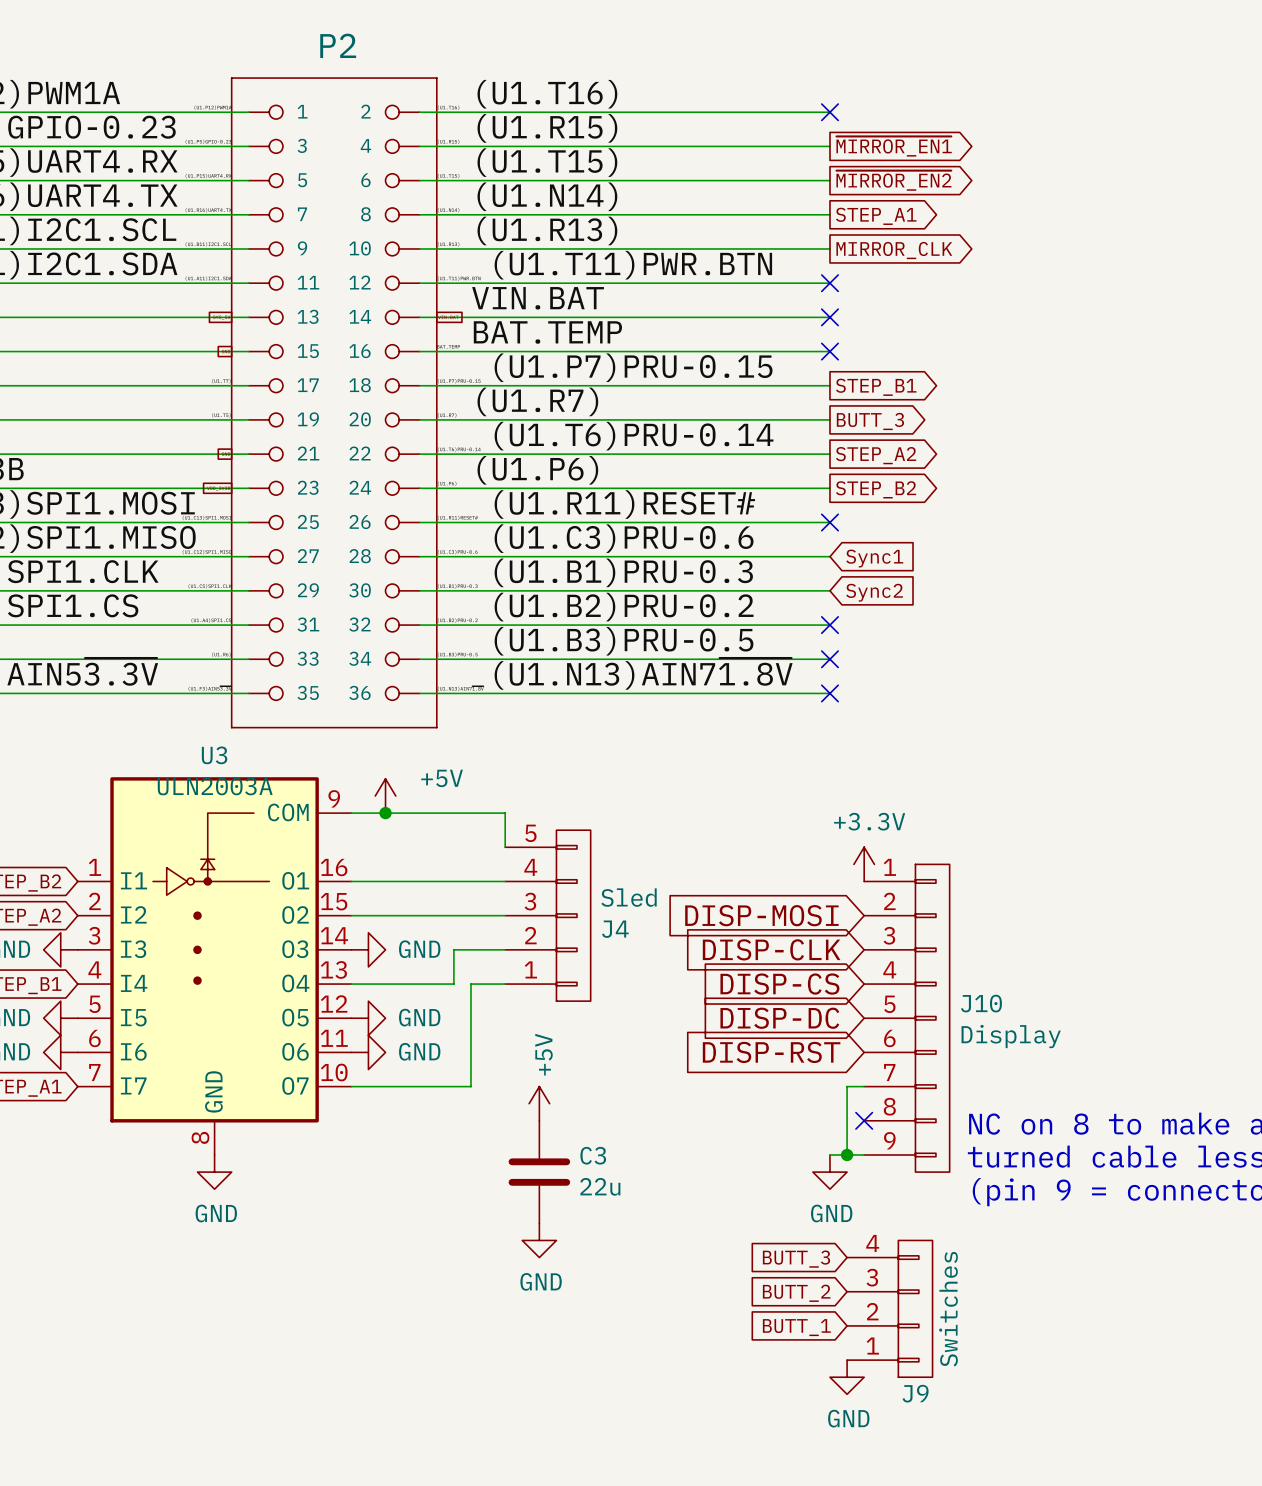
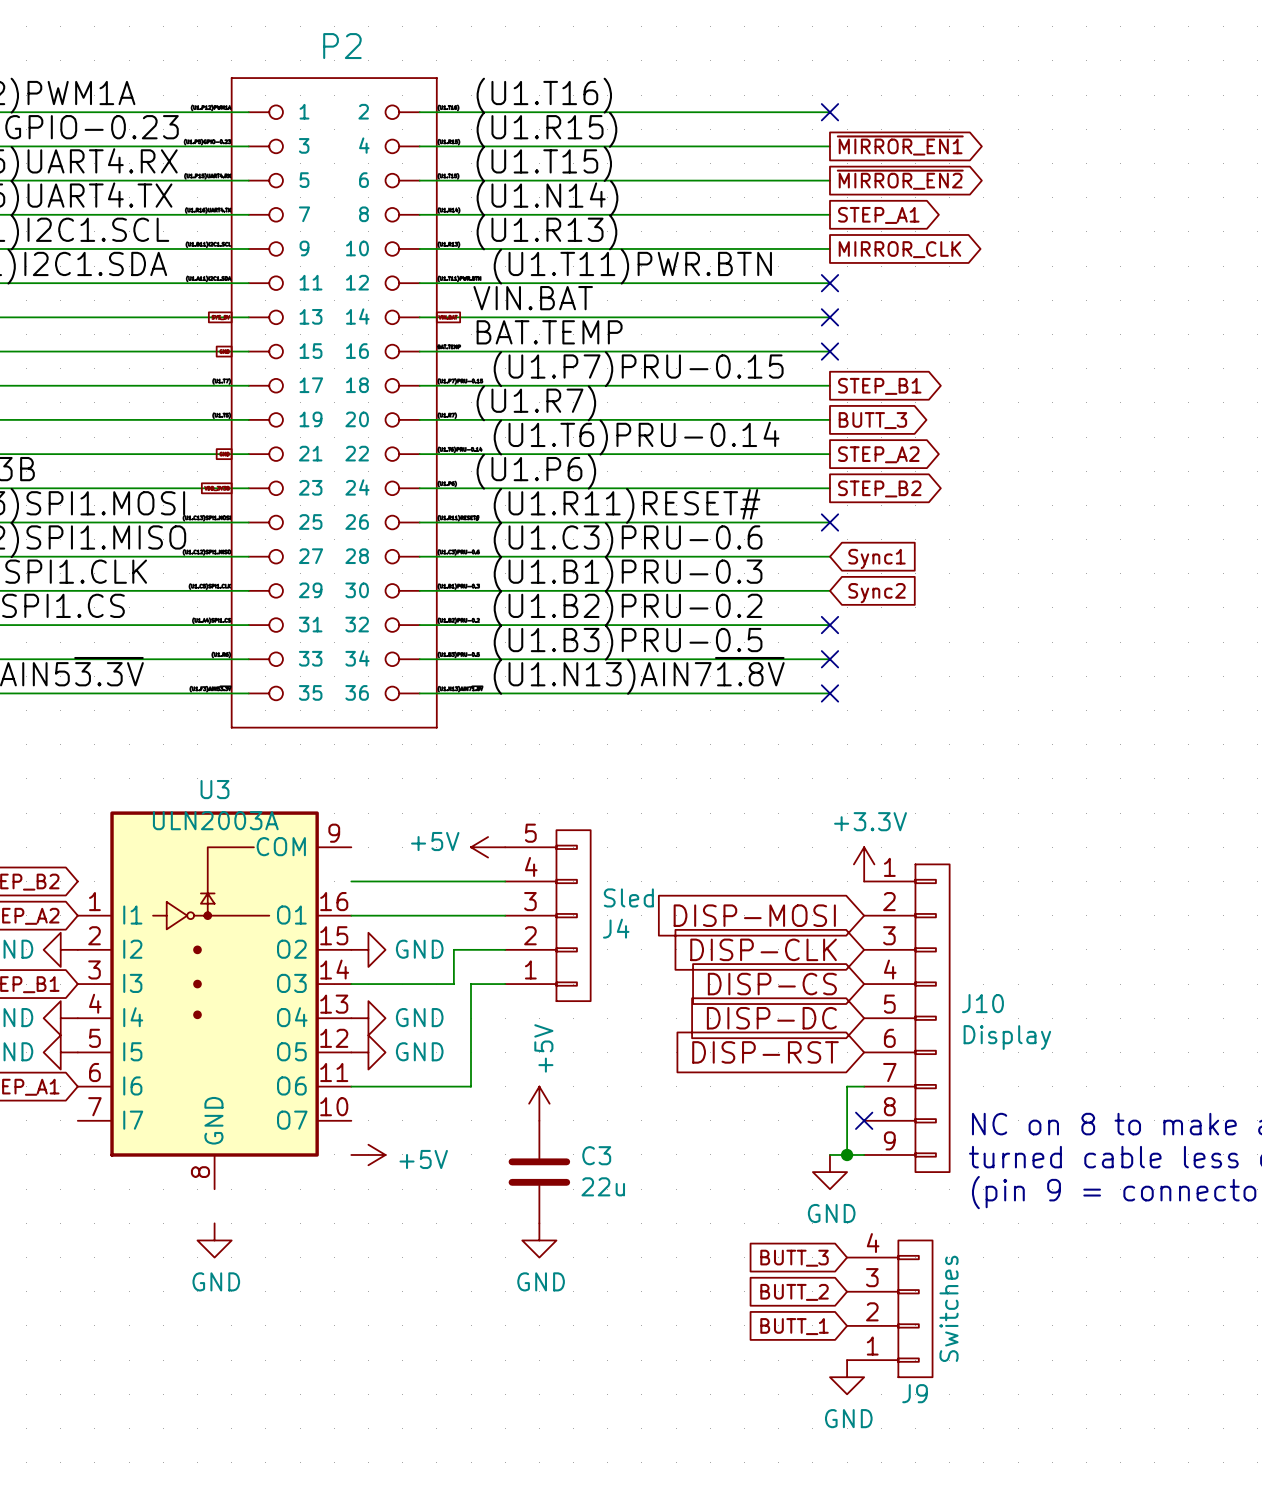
power symbol text position: +5V (442, 778) -> +5V (435, 841)
power symbol rotation: 0° (385, 796) -> 90° counterclockwise (488, 847)
power symbol position: +5V (385, 796) -> +5V (488, 847)
wire: (351, 813) (505, 813) (505, 847) -> none
junction: (385, 813) -> none
U3 position: (214, 966) -> (214, 1000)
power symbol: none -> +5V (368, 1154)
power symbol position: GND (214, 1172) -> GND (214, 1240)

